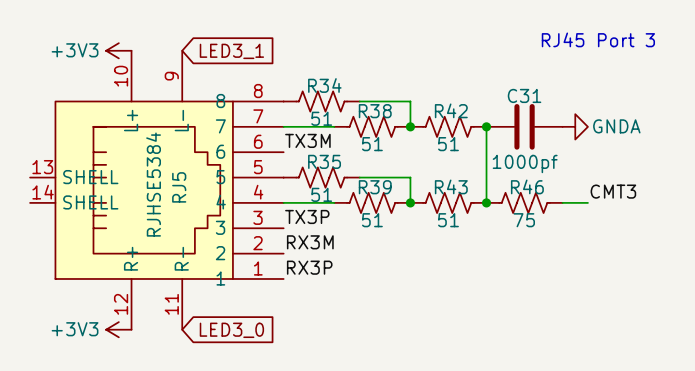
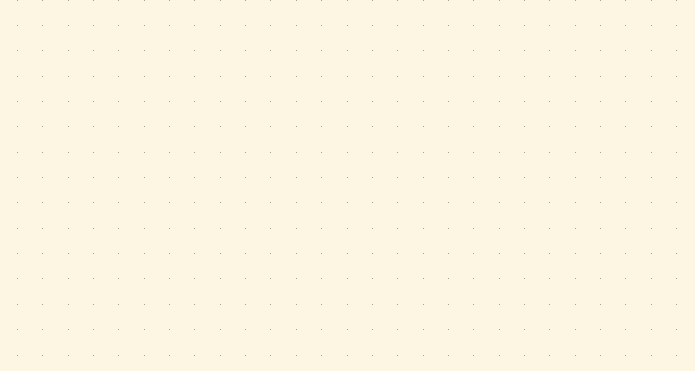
text: RJ45 Port 3 (598, 39) -> none
power symbol: +3V3 (118, 50) -> none
global label: LED3_1 (231, 51) -> none
R34: 51 (321, 101) -> none
wire: (359, 101) (410, 101) (410, 126) -> none
wire: (283, 126) (334, 126) -> none
R38: 51 (372, 126) -> none
junction: (410, 126) -> none
R42: 51 (448, 126) -> none
wire: (486, 126) (486, 202) -> none
junction: (486, 126) -> none
C31: 1000pf (524, 126) -> none
power symbol: GNDA (575, 126) -> none
label: TX3M (307, 140) -> none
R35: 51 (321, 177) -> none
wire: (359, 177) (410, 177) (410, 202) -> none
RJ5: RJHSE5384 (156, 190) -> none
label: CMT3 (613, 191) -> none
wire: (283, 202) (334, 202) -> none
R39: 51 (372, 202) -> none
junction: (410, 202) -> none
R43: 51 (448, 202) -> none
junction: (486, 202) -> none
R46: 75 (524, 202) -> none
wire: (562, 202) (587, 202) -> none
label: TX3P (307, 216) -> none
label: RX3M (310, 242) -> none
label: RX3P (309, 267) -> none
power symbol: +3V3 (118, 329) -> none
global label: LED3_0 (231, 330) -> none

